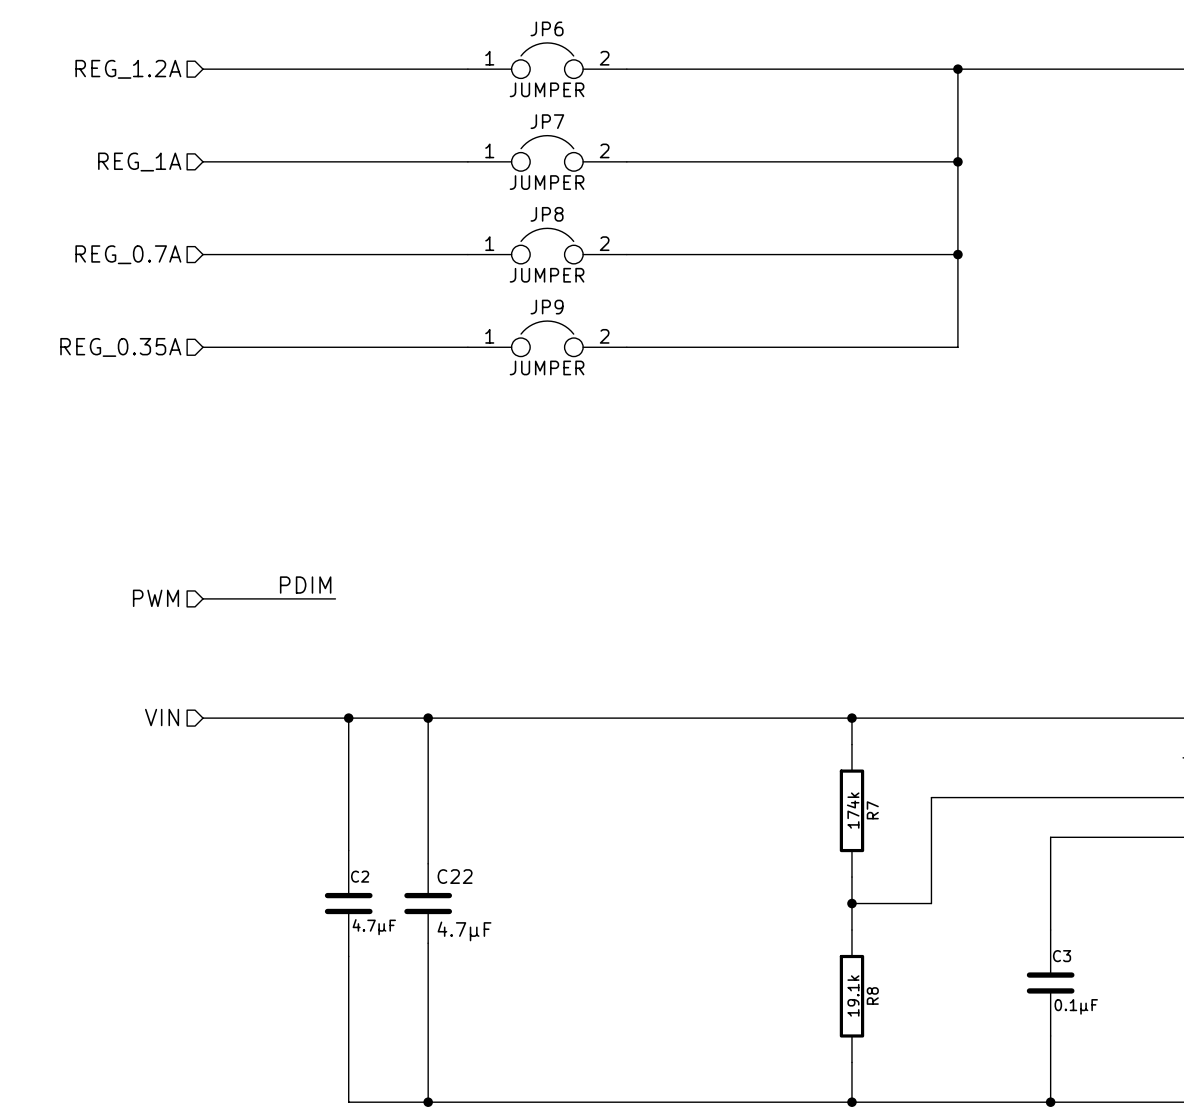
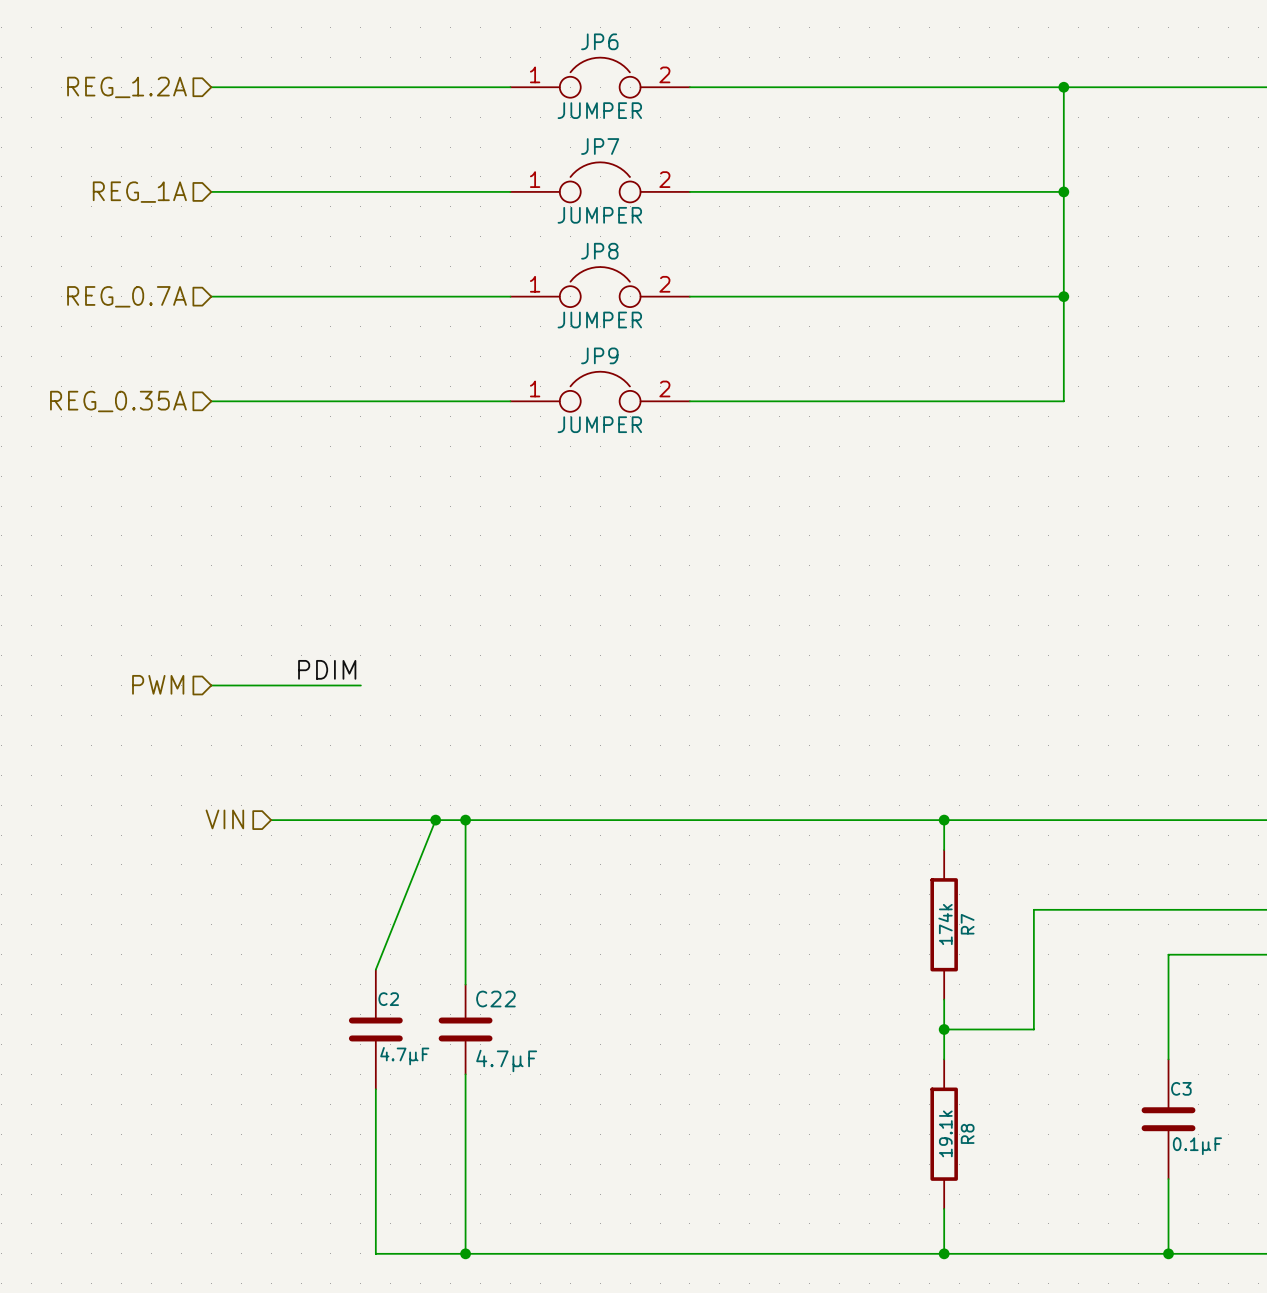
hierarchical label position: VIN (162, 717) -> VIN (224, 819)
wire: (203, 718) (256, 718) -> none
wire: (348, 718) (348, 850) -> (435, 820) (375, 969)
junction position: (348, 718) -> (435, 820)

